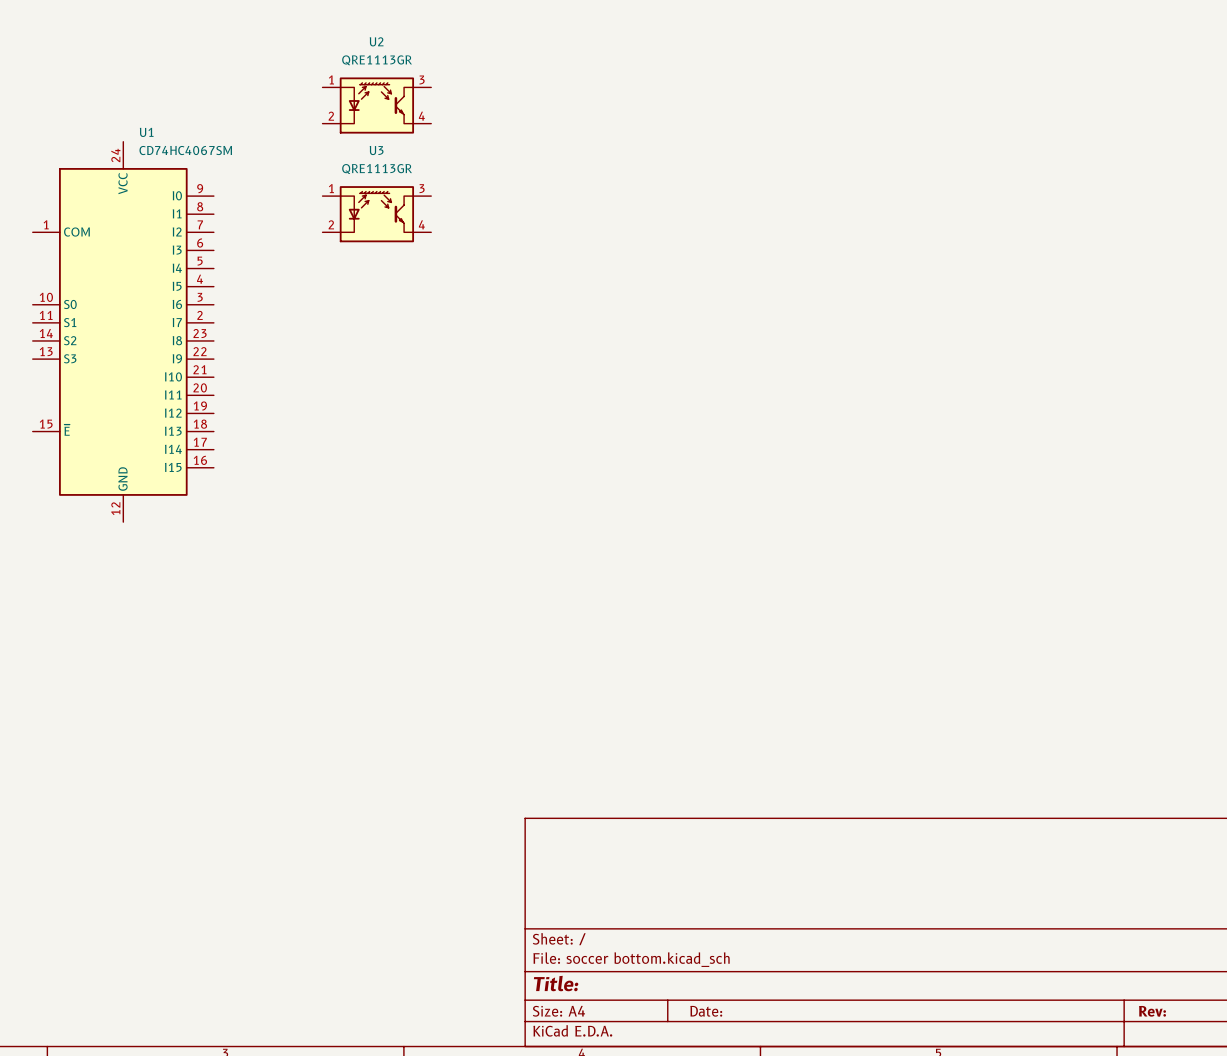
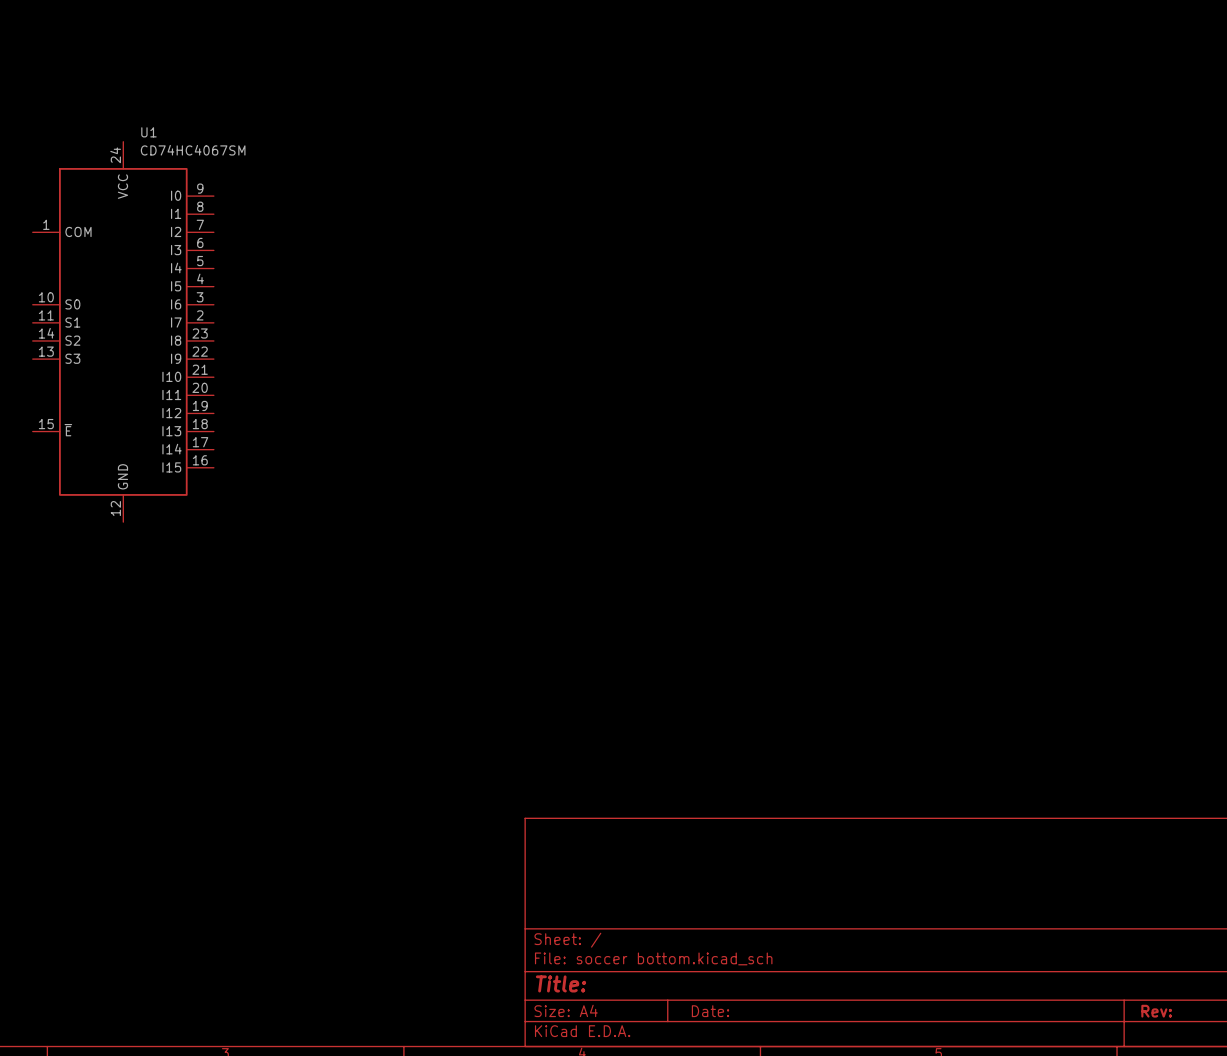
U2: QRE1113GR (376, 105) -> none
U3: QRE1113GR (376, 214) -> none

